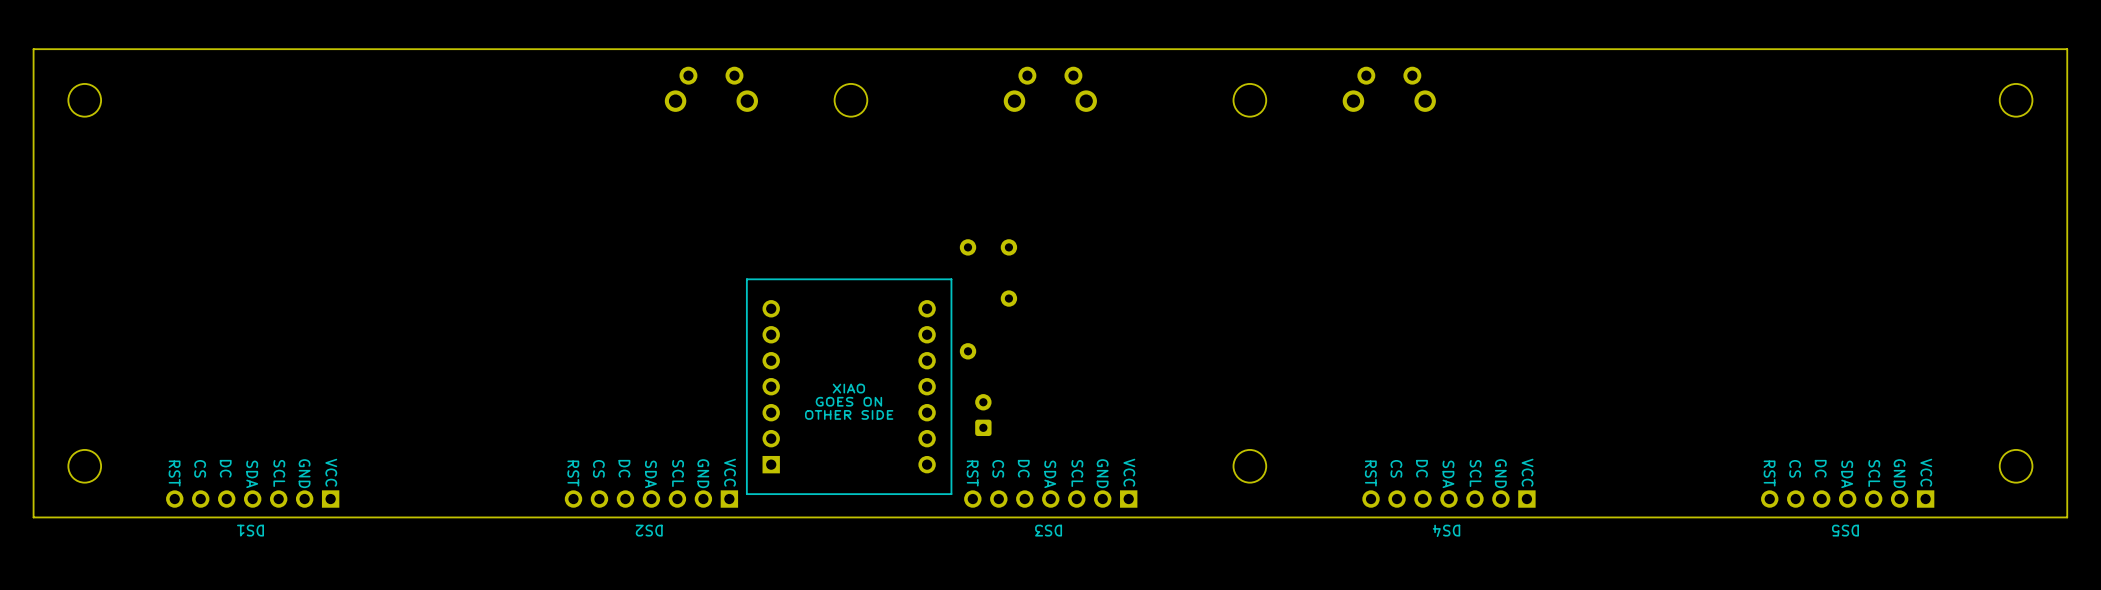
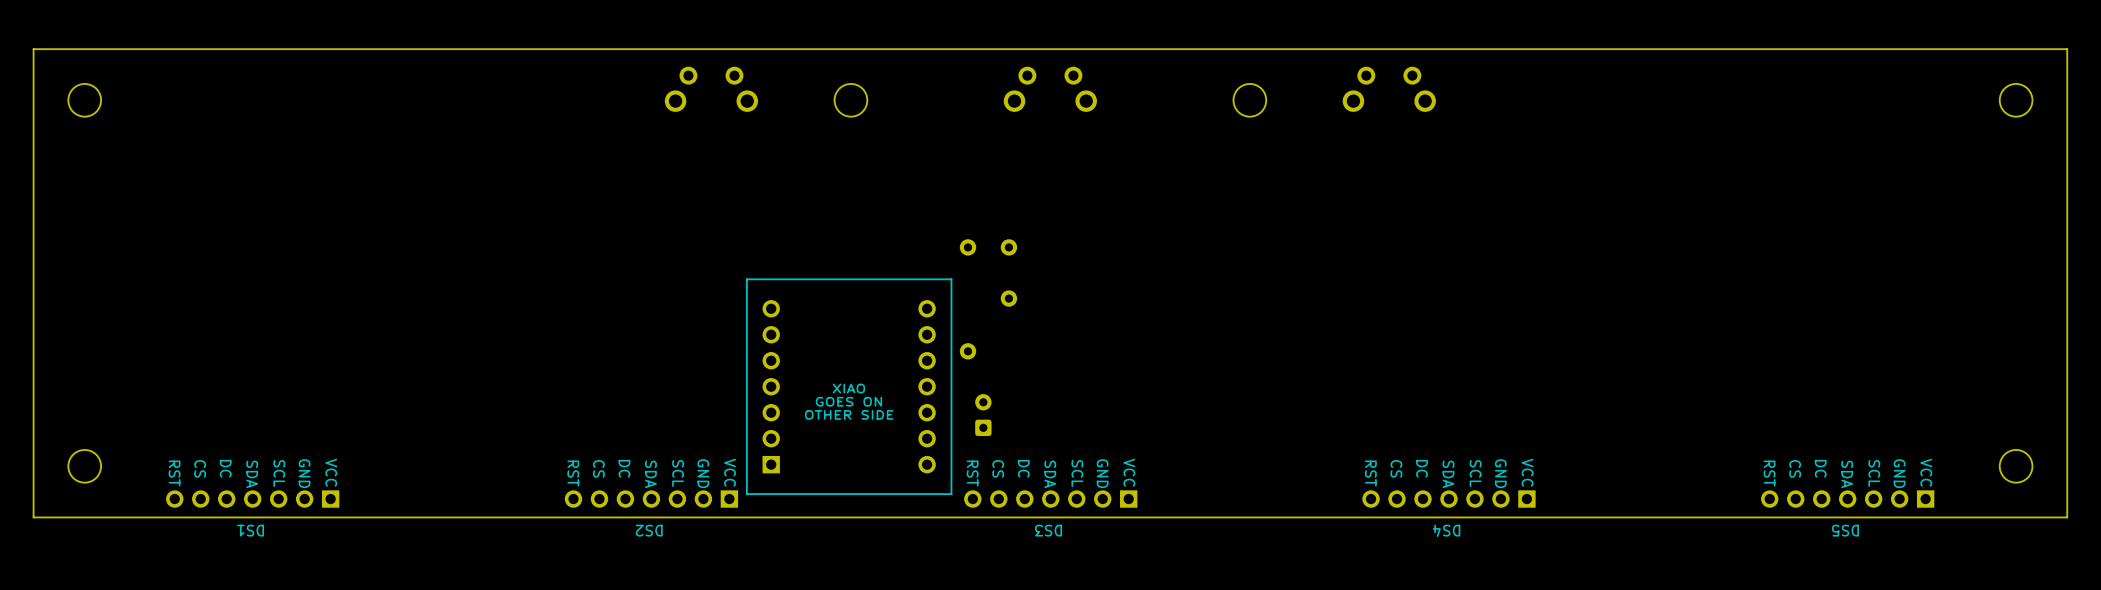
round board edge: [1232, 449, 1267, 484] -> none

